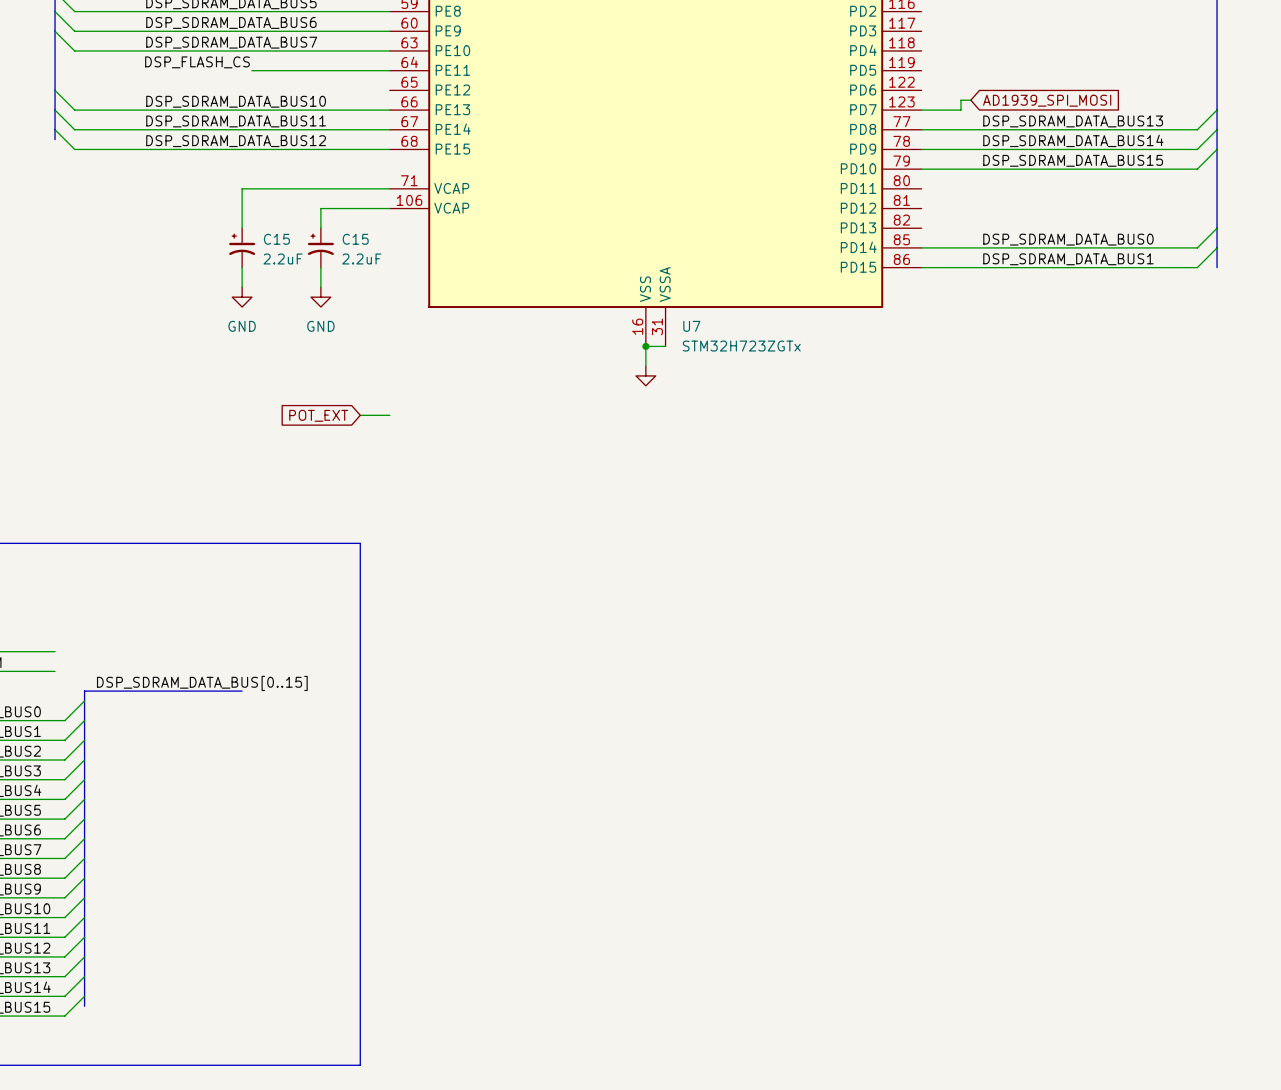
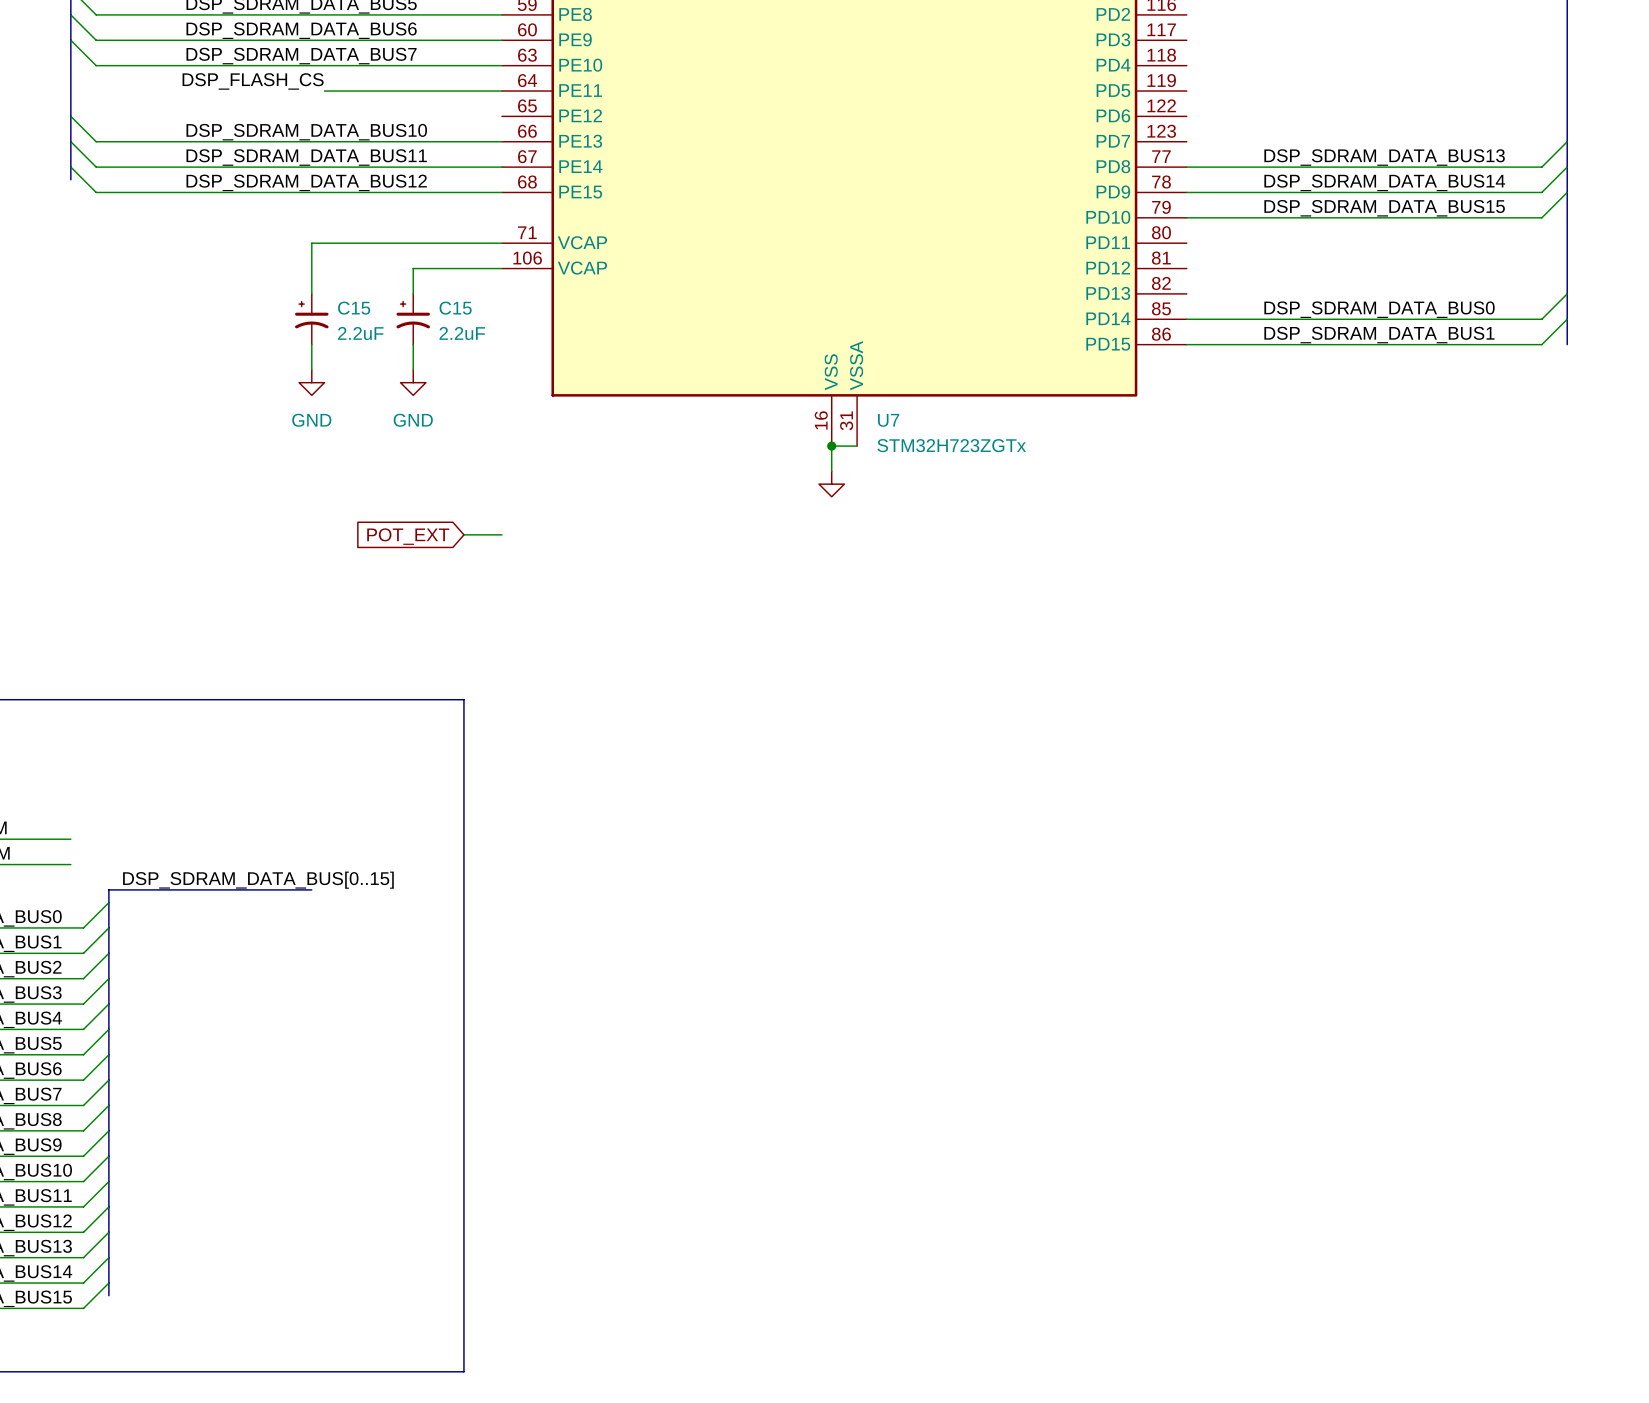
wire: (970, 100) (960, 100) (960, 110) (921, 110) -> none
global label: AD1939_SPI_MOSI (1047, 100) -> none

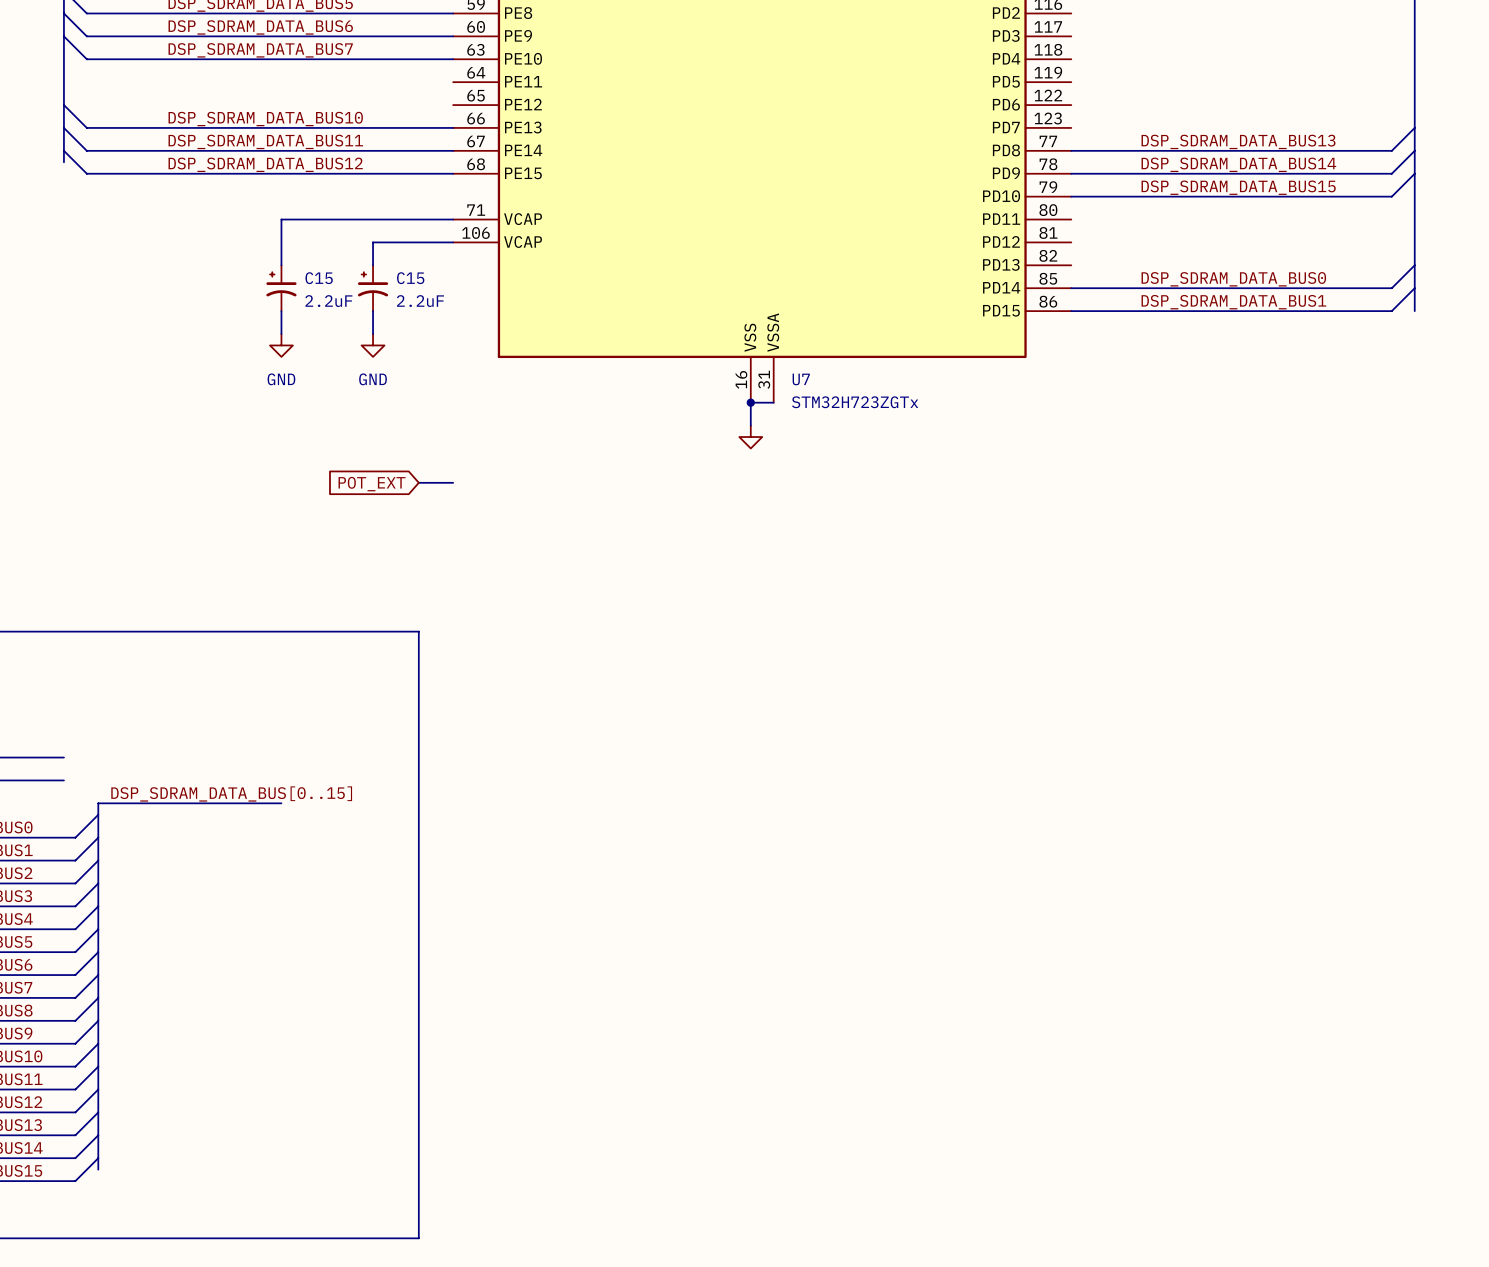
label: DSP_FLASH_CS (253, 81) -> none
wire: (324, 91) (502, 91) -> none

